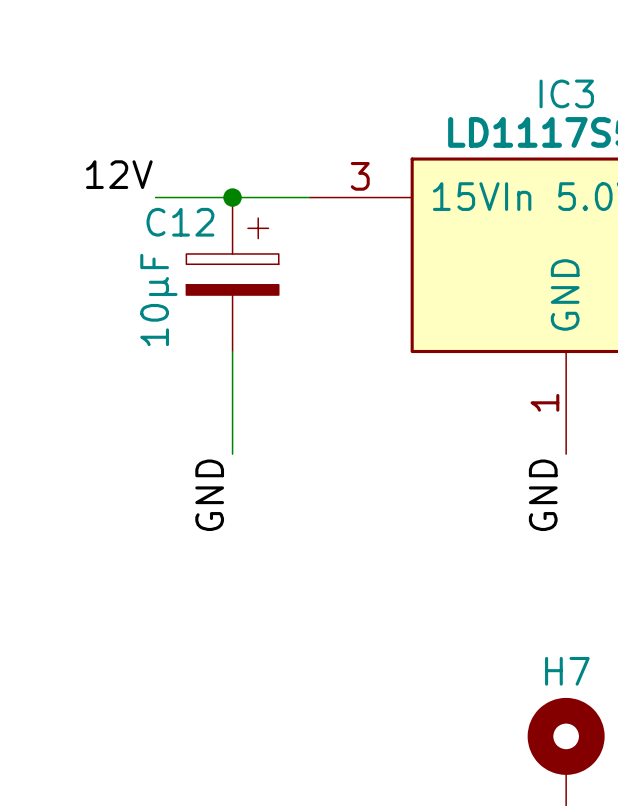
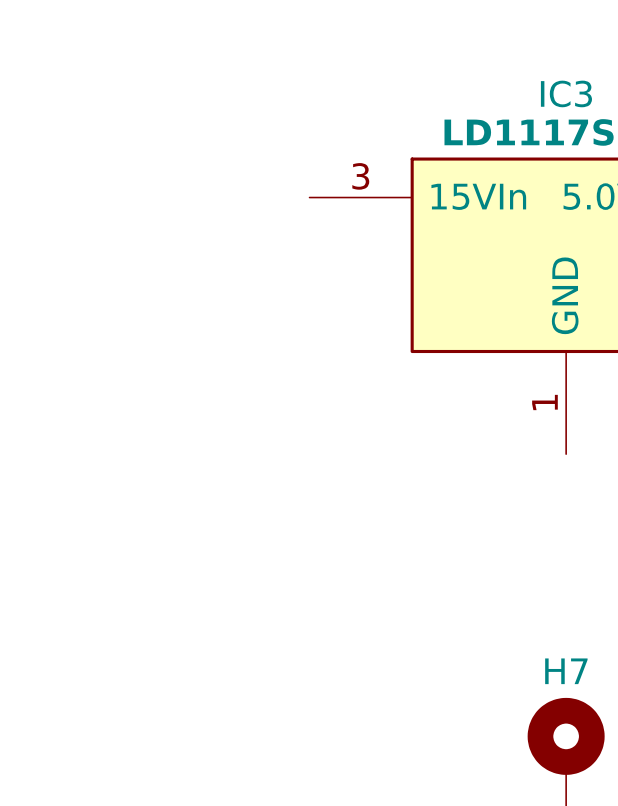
label: 12V (119, 174) -> none
wire: (155, 197) (309, 197) -> none
junction: (232, 197) -> none
C12: 10μF (232, 274) -> none
wire: (232, 351) (232, 454) -> none
label: GND (209, 495) -> none
label: GND (543, 495) -> none

